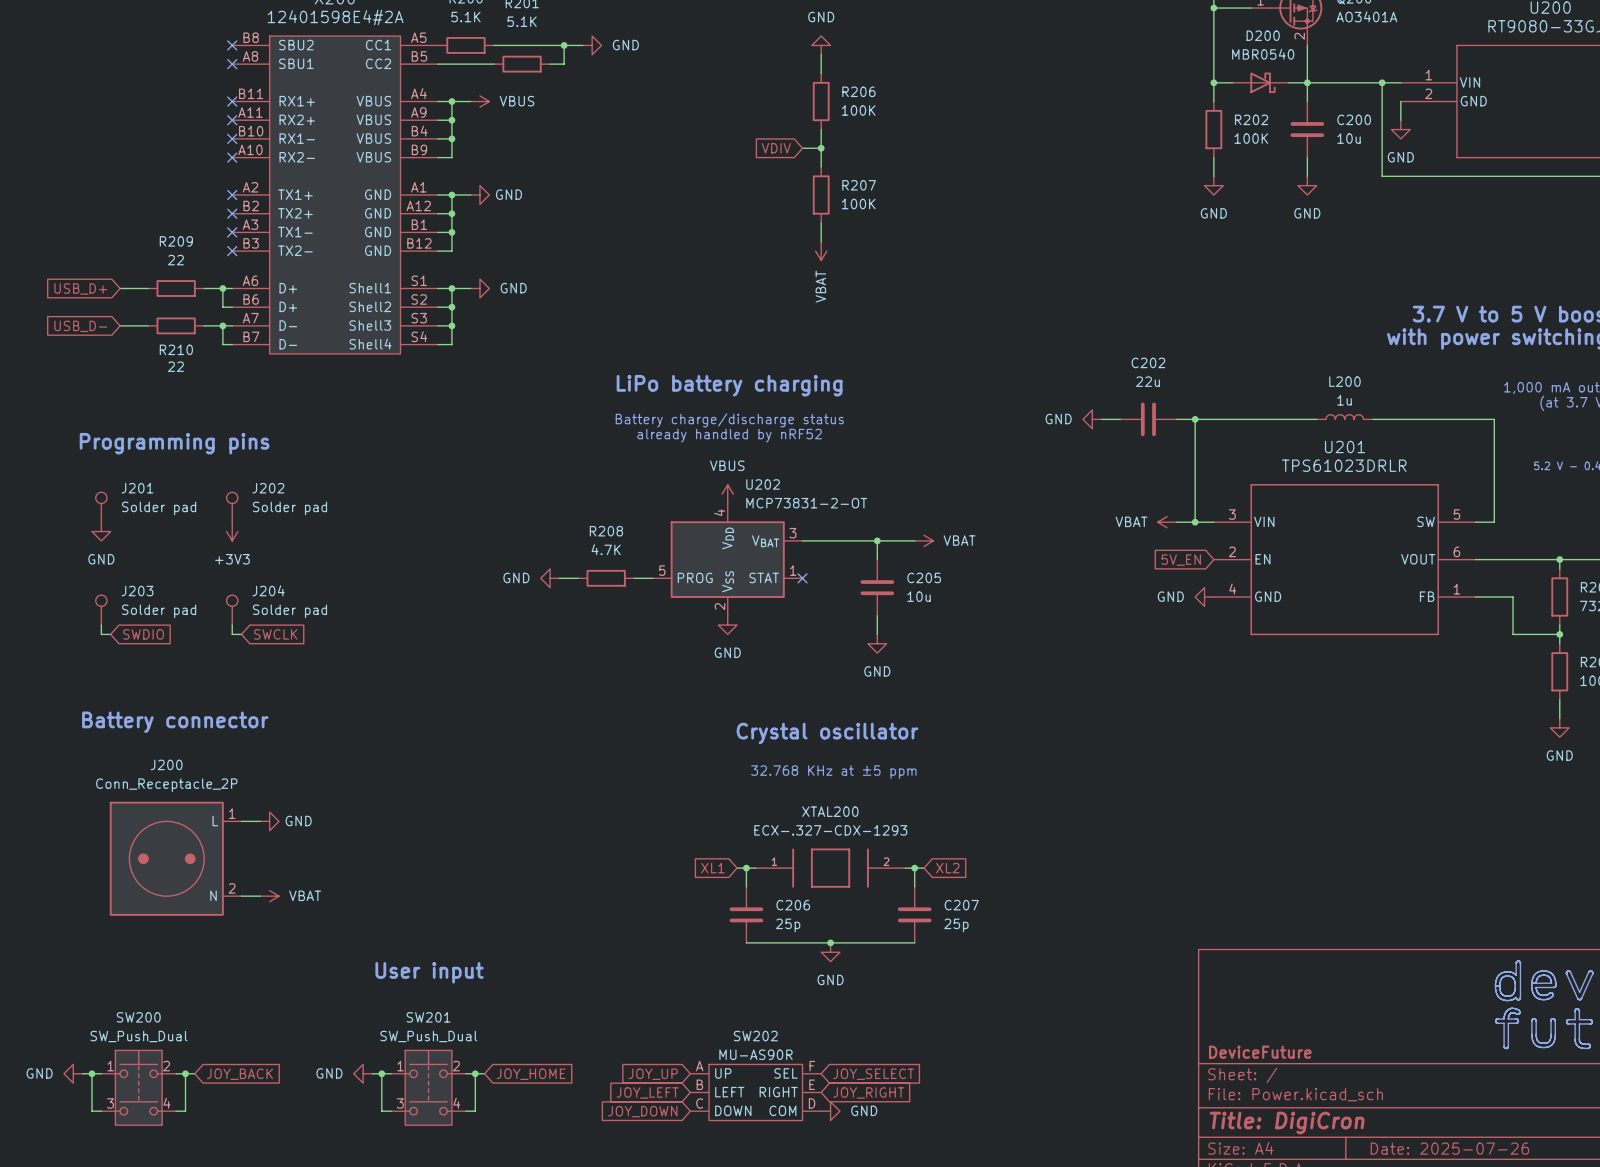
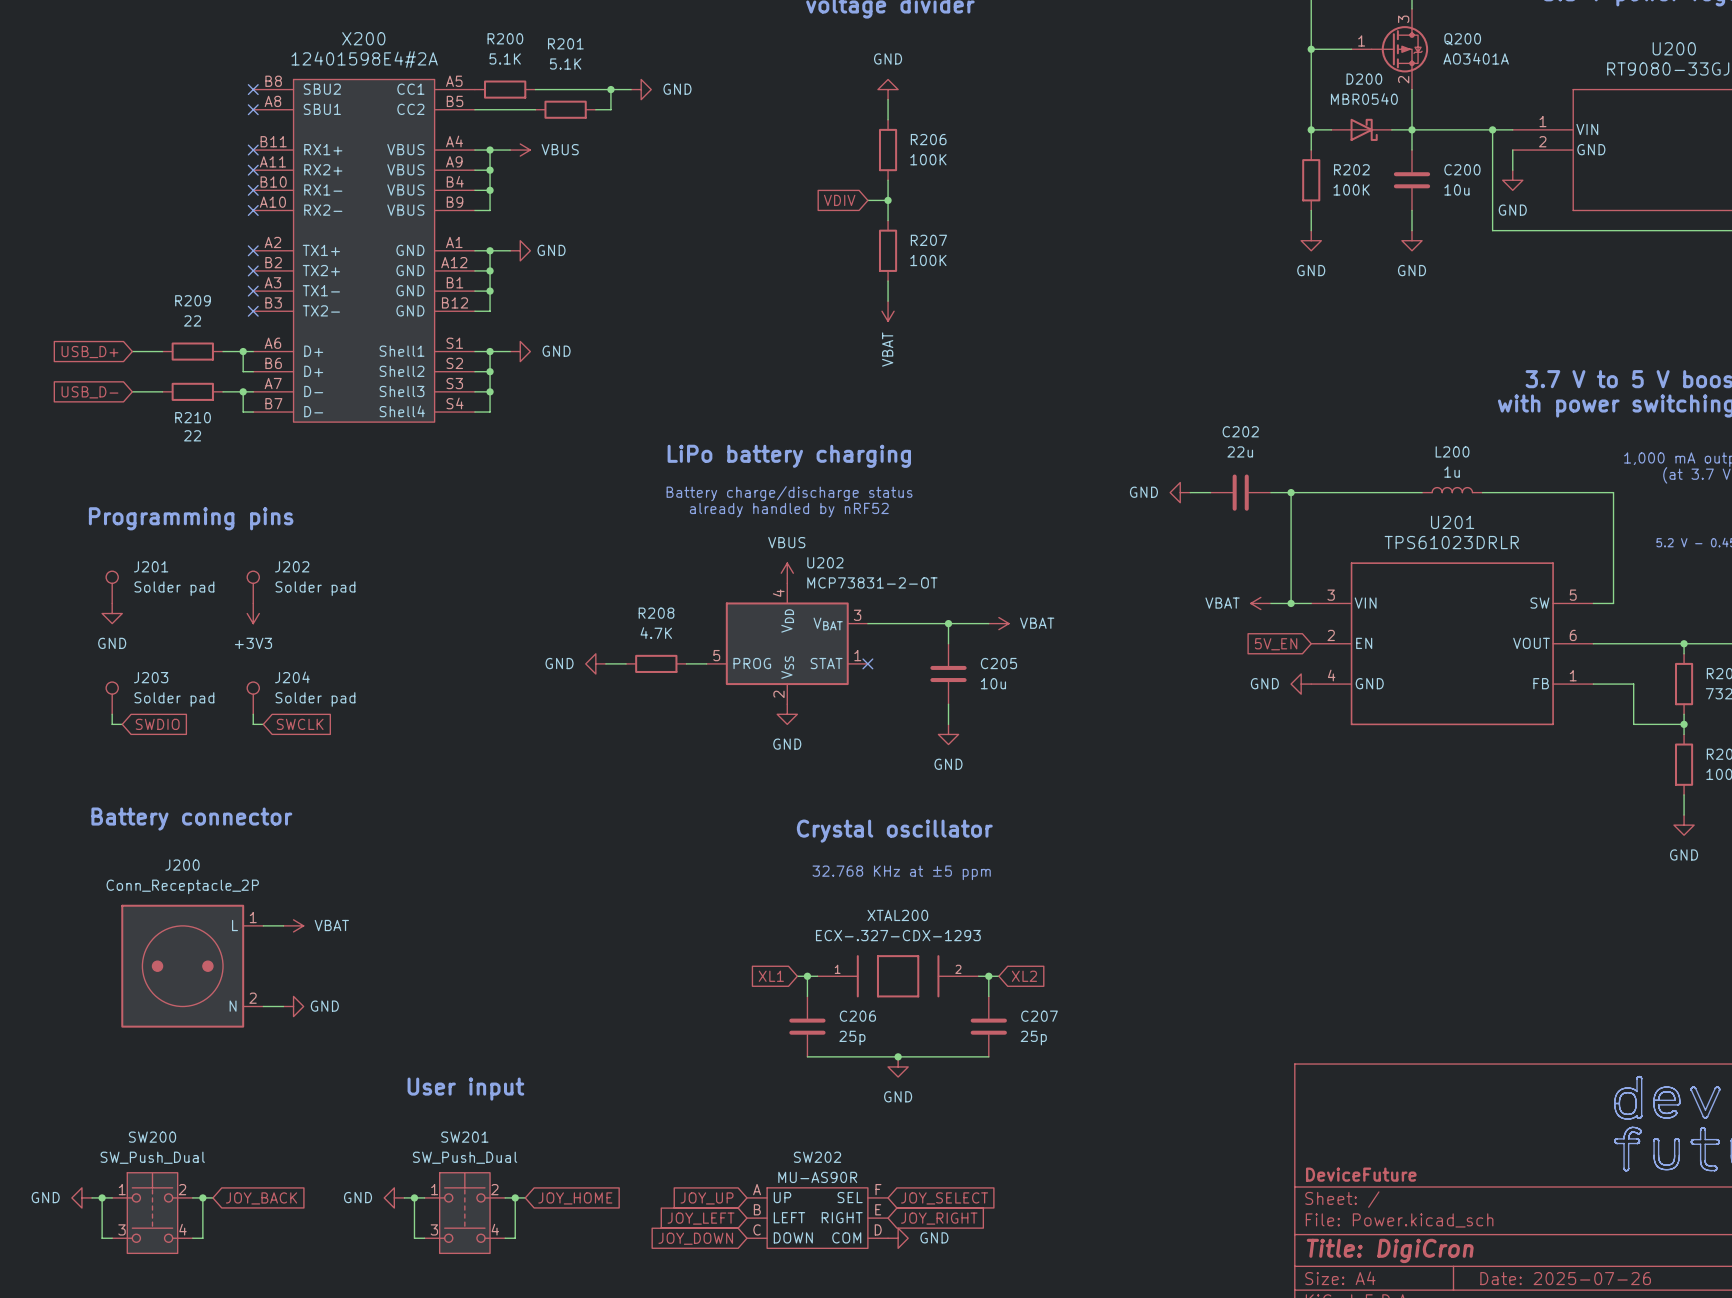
power symbol: GND (269, 821) -> VBAT (293, 925)
power symbol: VBAT (269, 896) -> GND (293, 1006)

